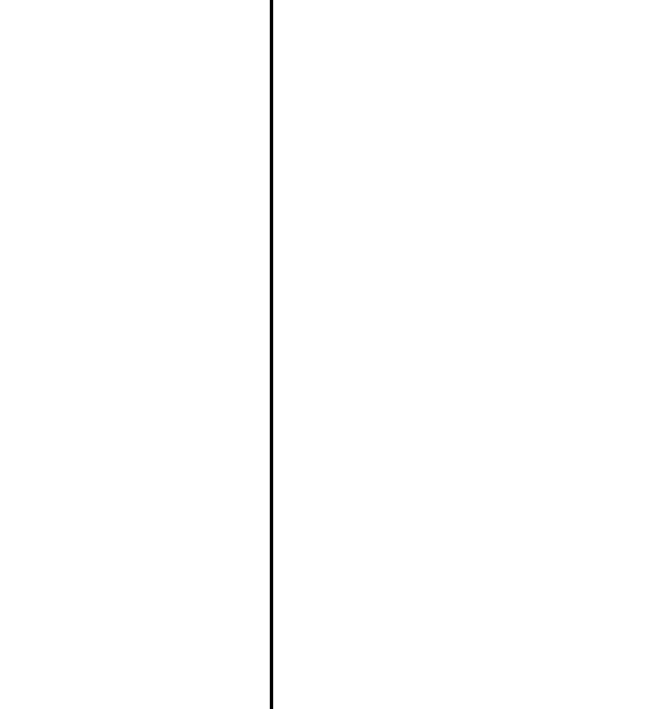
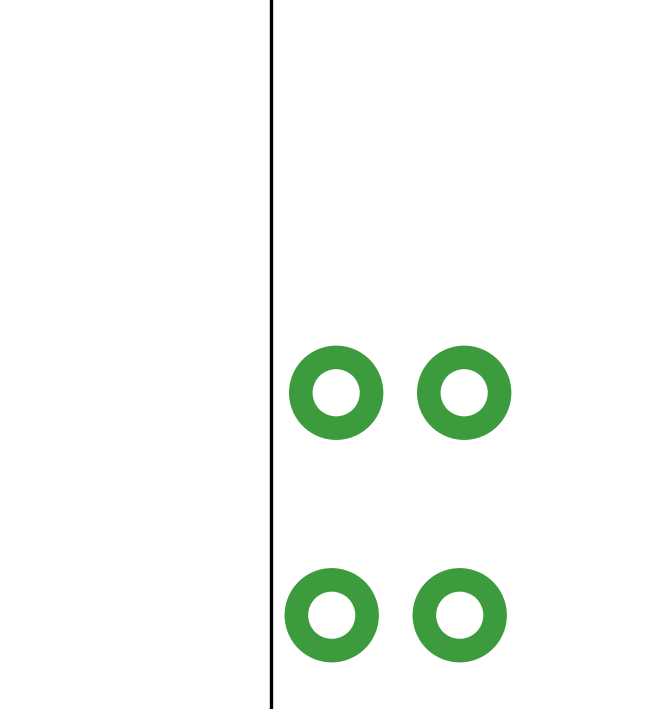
part: none -> (400, 392)
part: none -> (395, 615)

